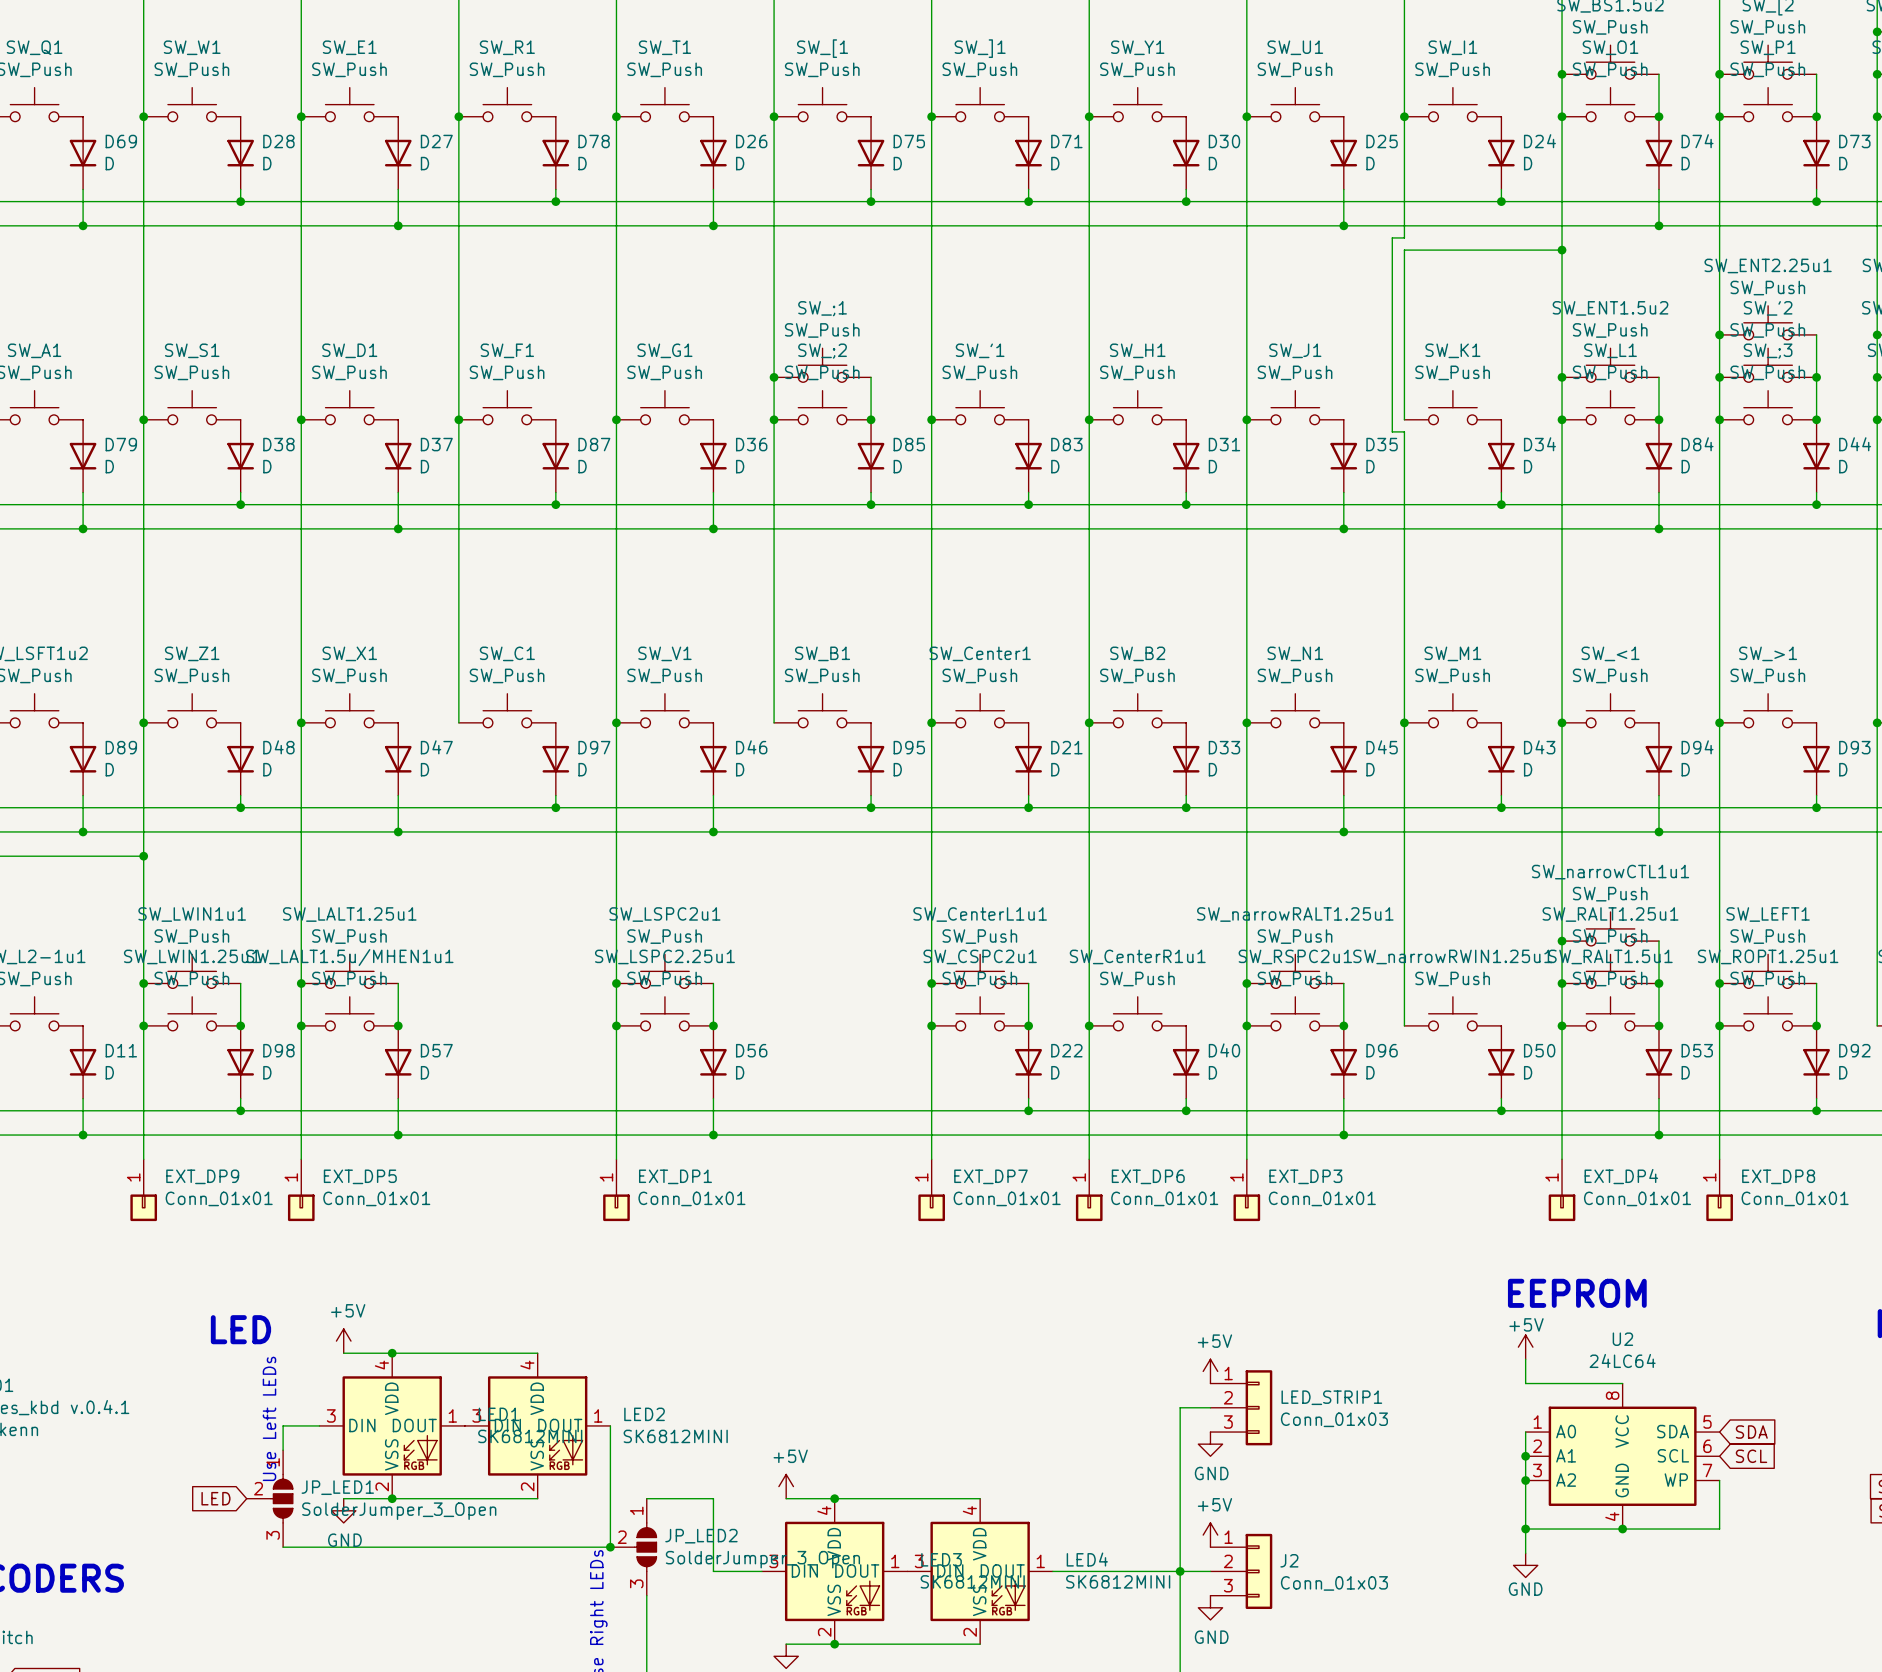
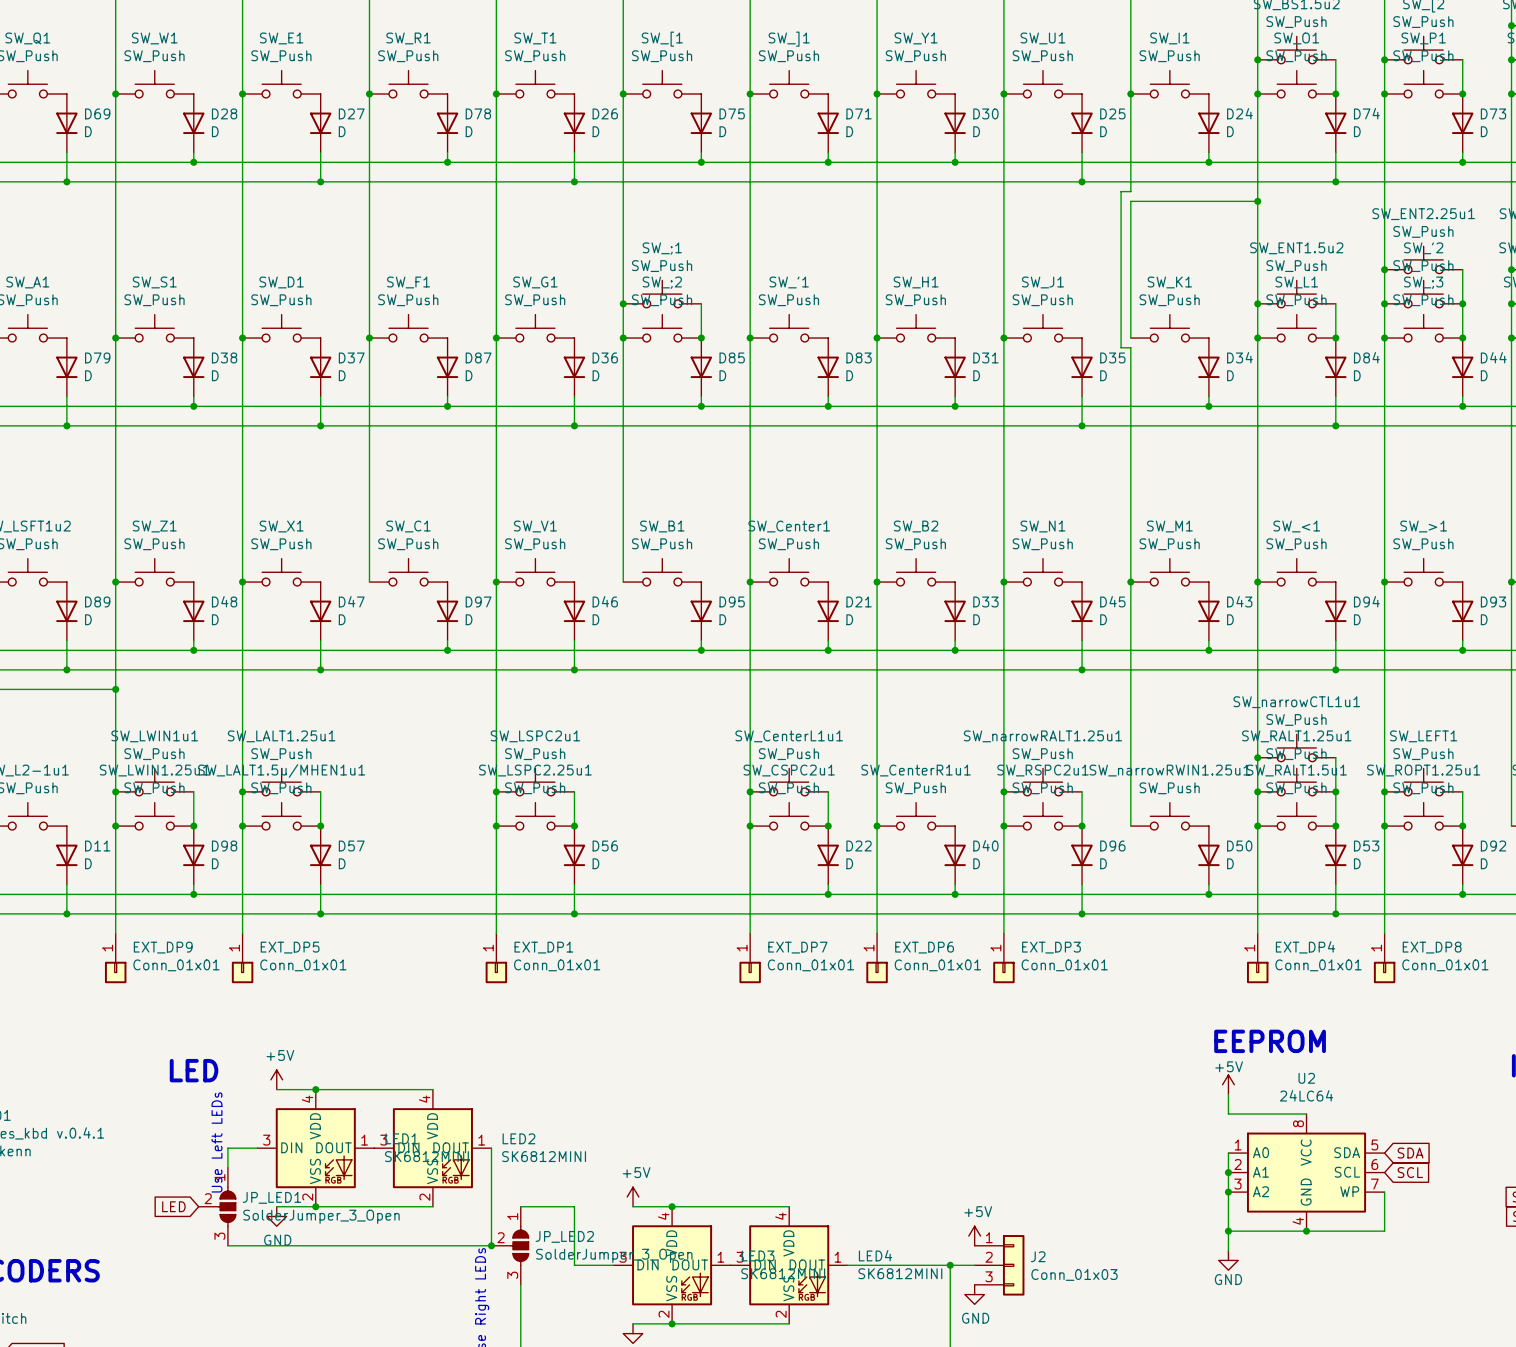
power symbol: +5V (1210, 1371) -> none
wire: (1210, 1407) (1180, 1407) (1180, 1571) -> none
LED_STRIP1: Conn_01x03 (1241, 1407) -> none
power symbol: GND (1210, 1444) -> none

